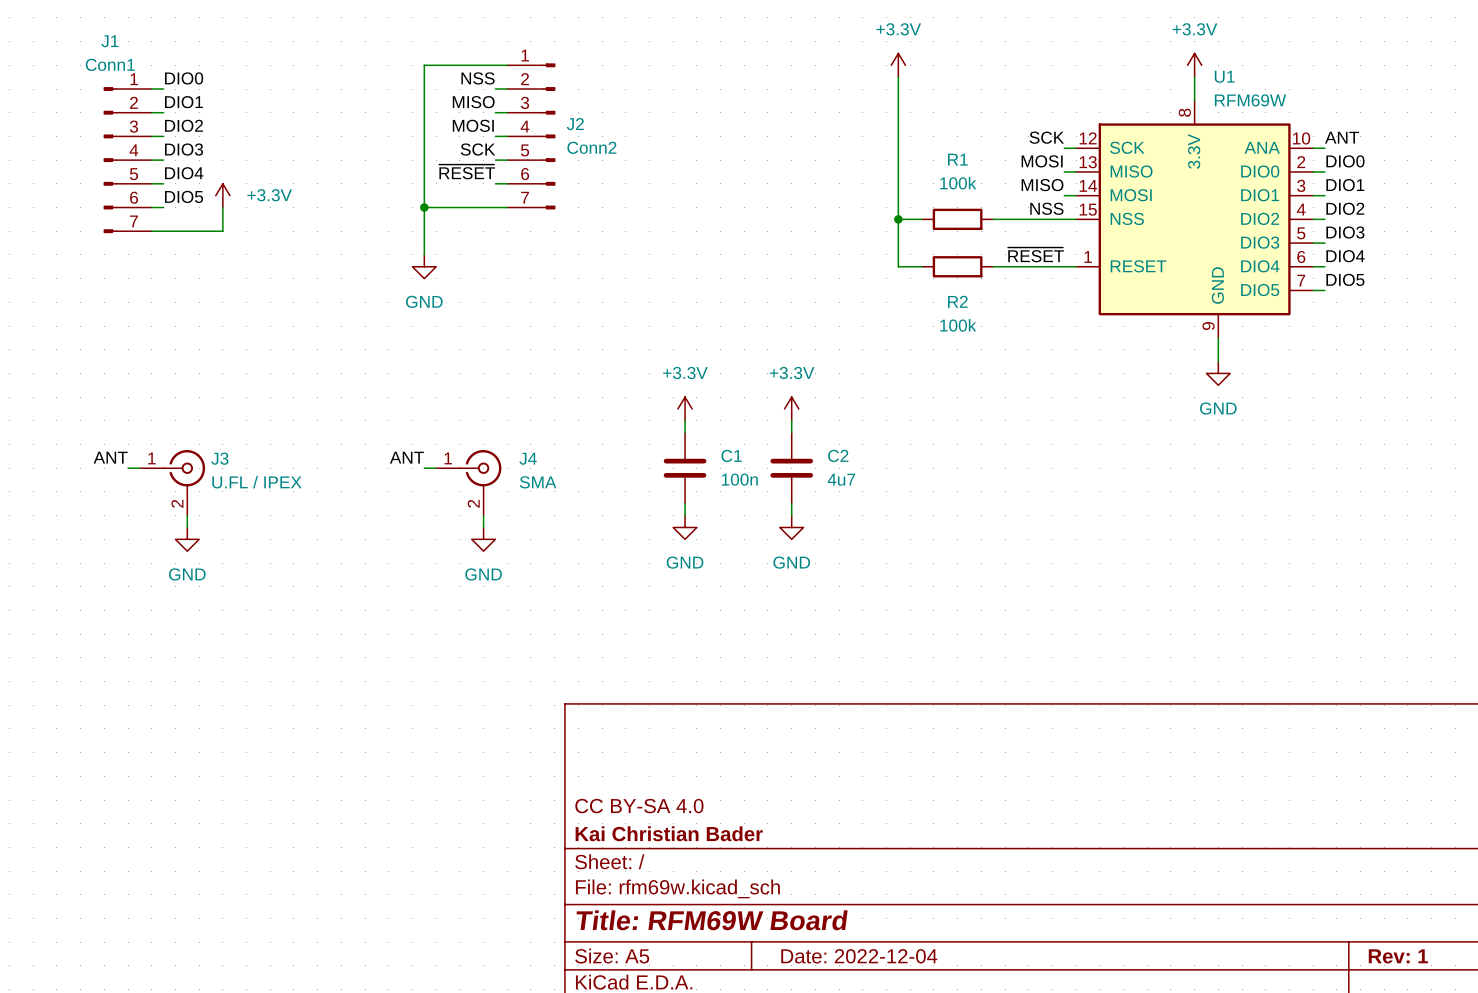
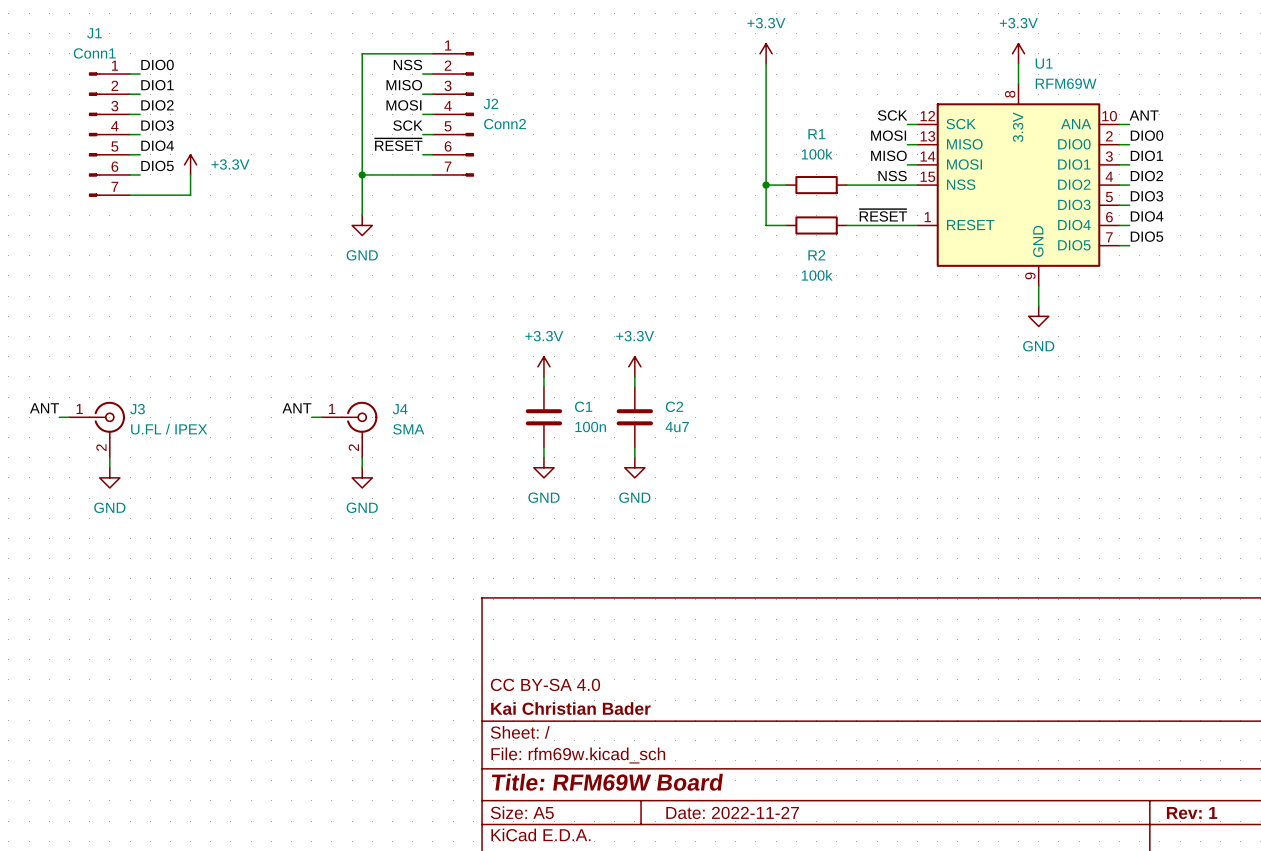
power symbol: +3.3V (685, 408) -> none
power symbol: +3.3V (791, 408) -> none
wire: (685, 420) (685, 432) -> (543, 376) (543, 387)
wire: (791, 420) (791, 432) -> (634, 376) (634, 387)
power symbol: none -> +3.3V (543, 366)
power symbol: none -> +3.3V (634, 366)
label position: ANT (110, 457) -> ANT (44, 408)
label position: ANT (406, 457) -> ANT (296, 408)
wire: (128, 468) (139, 468) -> (59, 417) (69, 417)
wire: (424, 468) (436, 468) -> (311, 417) (321, 417)
C1 position: (685, 468) -> (543, 417)
C2 position: (791, 468) -> (634, 417)
J3 position: (172, 482) -> (97, 429)
J4 position: (468, 482) -> (349, 429)
wire: (685, 503) (685, 515) -> (543, 447) (543, 457)
wire: (791, 503) (791, 515) -> (634, 447) (634, 457)
wire: (187, 515) (187, 527) -> (109, 457) (109, 467)
wire: (483, 515) (483, 527) -> (362, 457) (362, 467)
power symbol: GND (685, 527) -> none
power symbol: GND (791, 527) -> none
power symbol position: GND (187, 539) -> GND (109, 477)
power symbol position: GND (483, 539) -> GND (362, 477)
power symbol: none -> GND (543, 467)
power symbol: none -> GND (634, 467)
title block: Date: 2022-12-04 (859, 956) -> Date: 2022-11-27 (732, 812)

